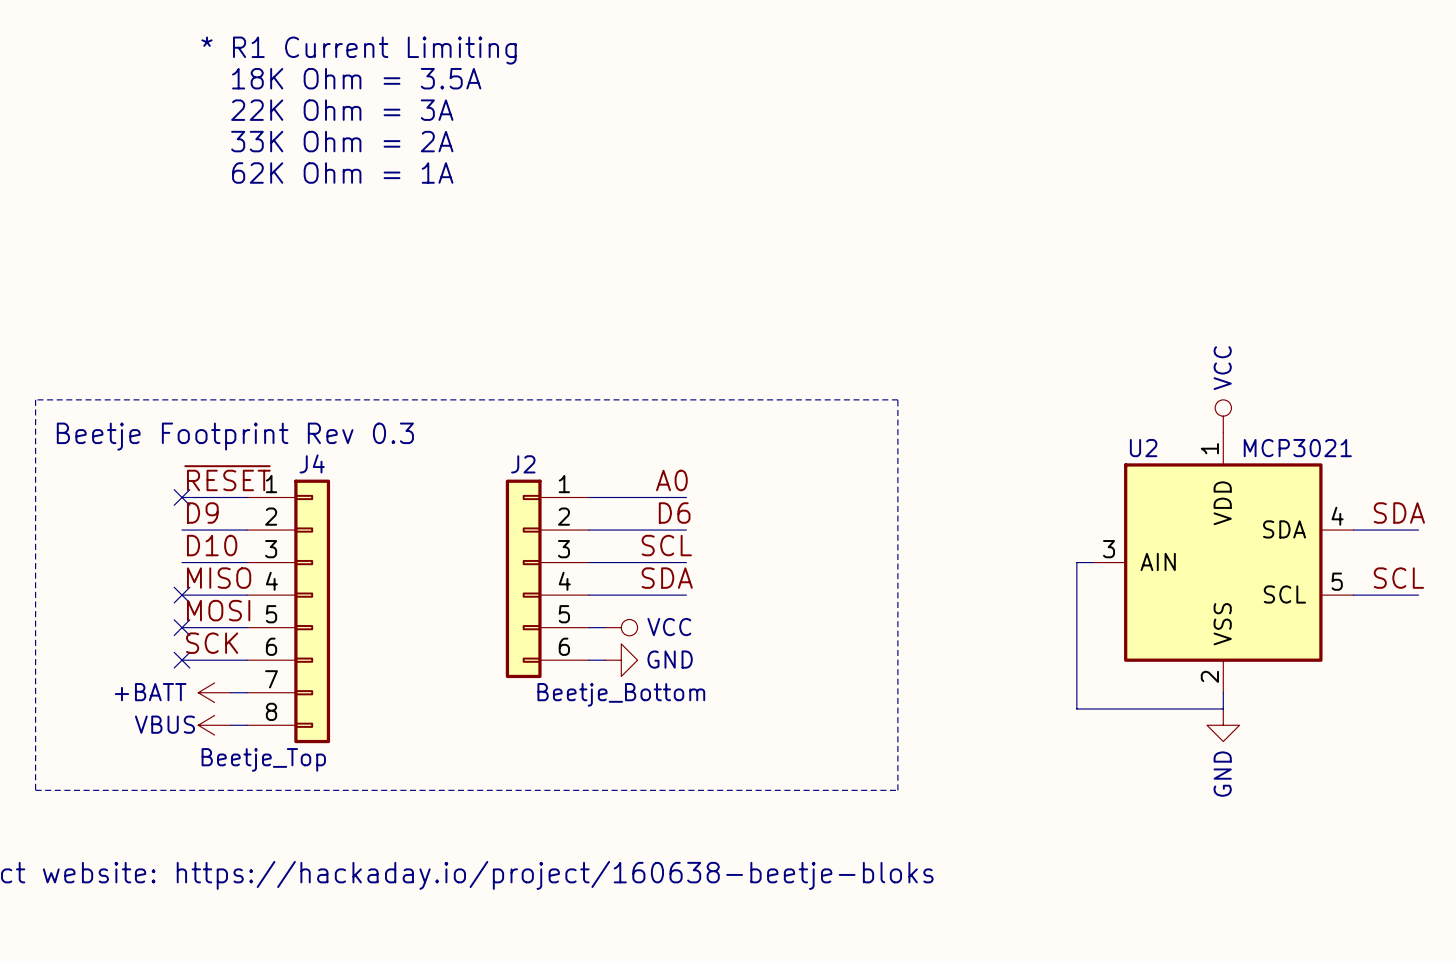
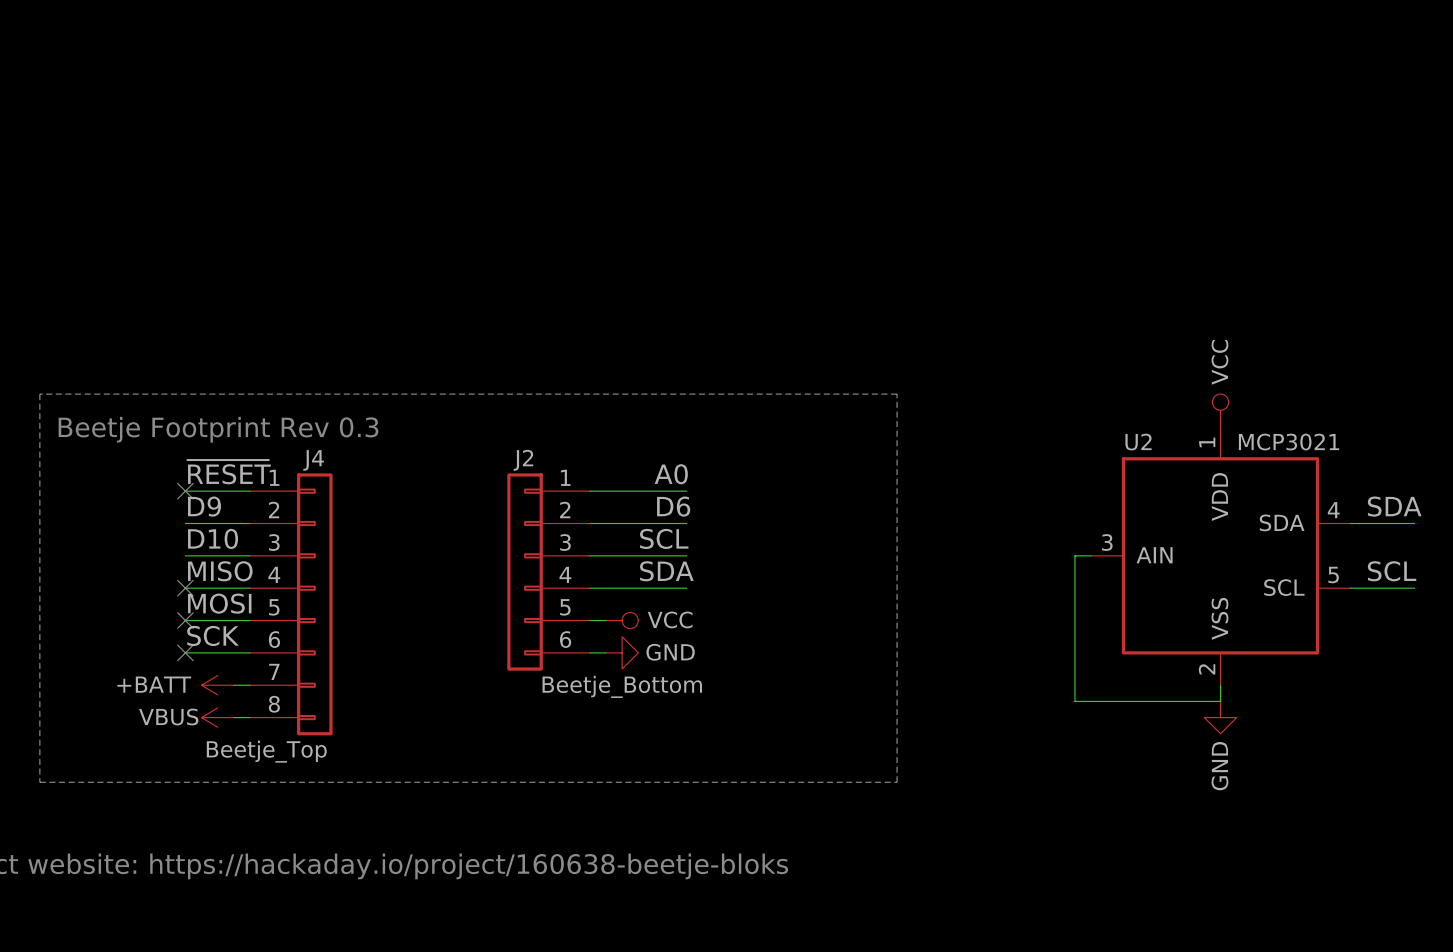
text: * R1 Current Limiting (359, 50) -> none
text: 18K Ohm = 3.5A (356, 78) -> none
text: 22K Ohm = 3A (342, 110) -> none
text: 33K Ohm = 2A (342, 141) -> none
text: 62K Ohm = 1A (342, 173) -> none

